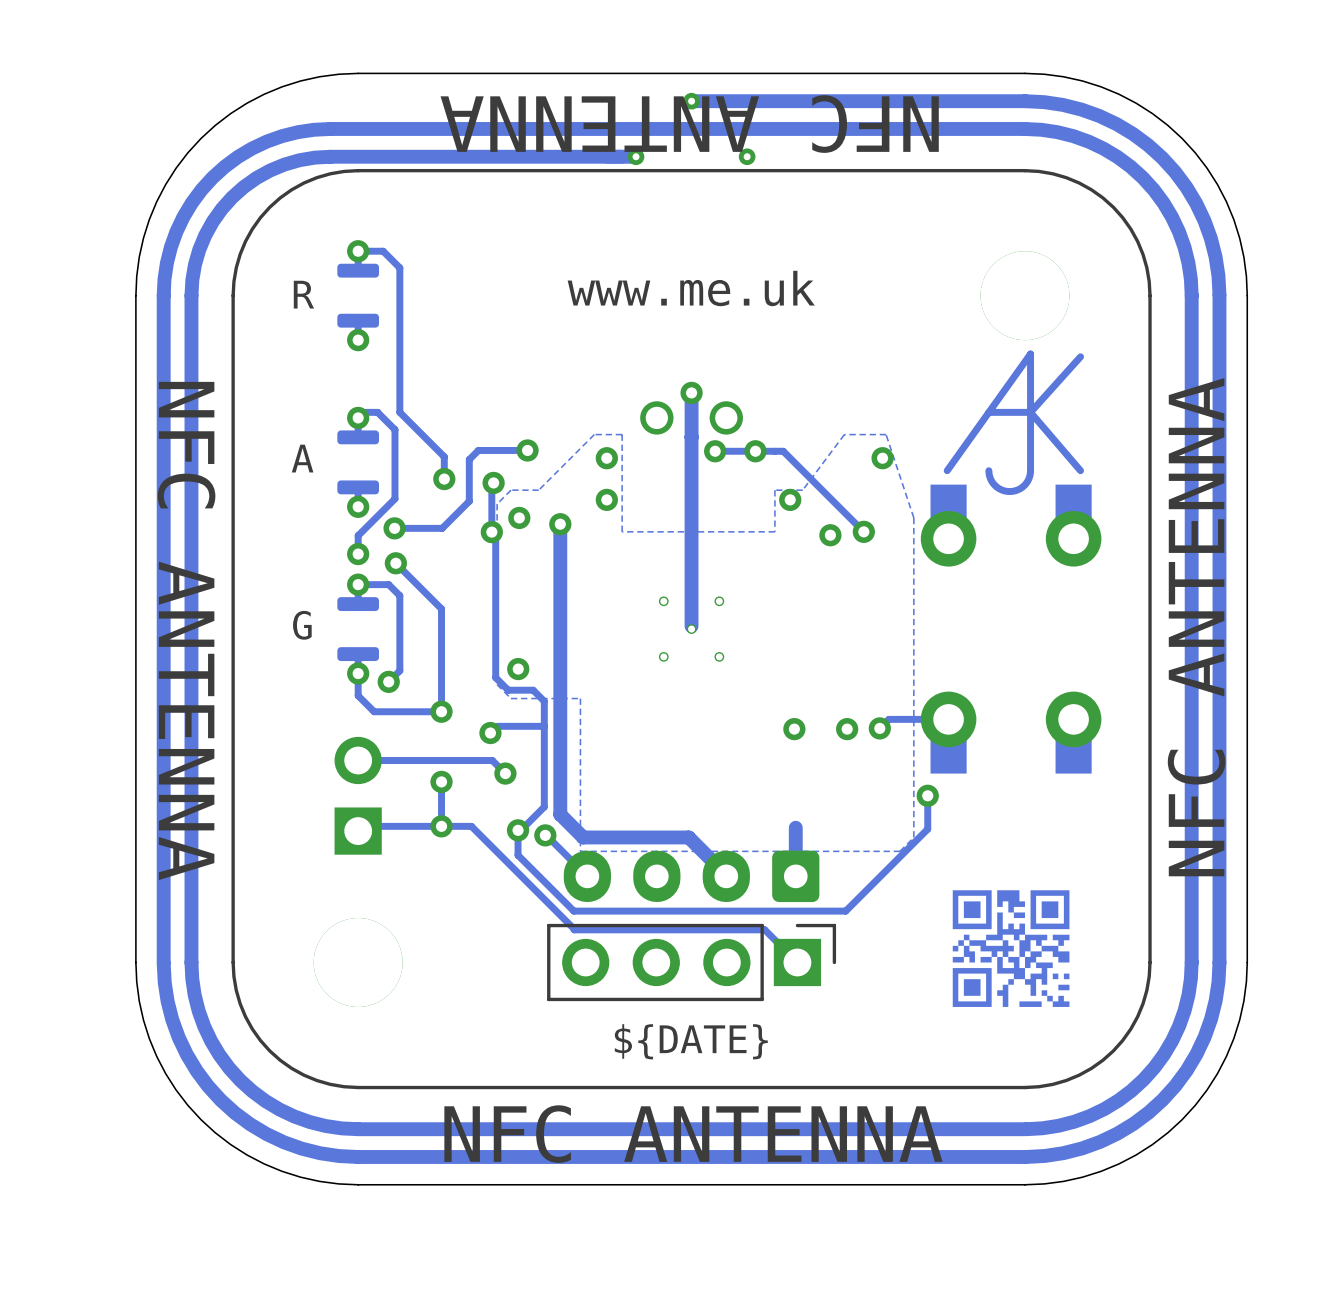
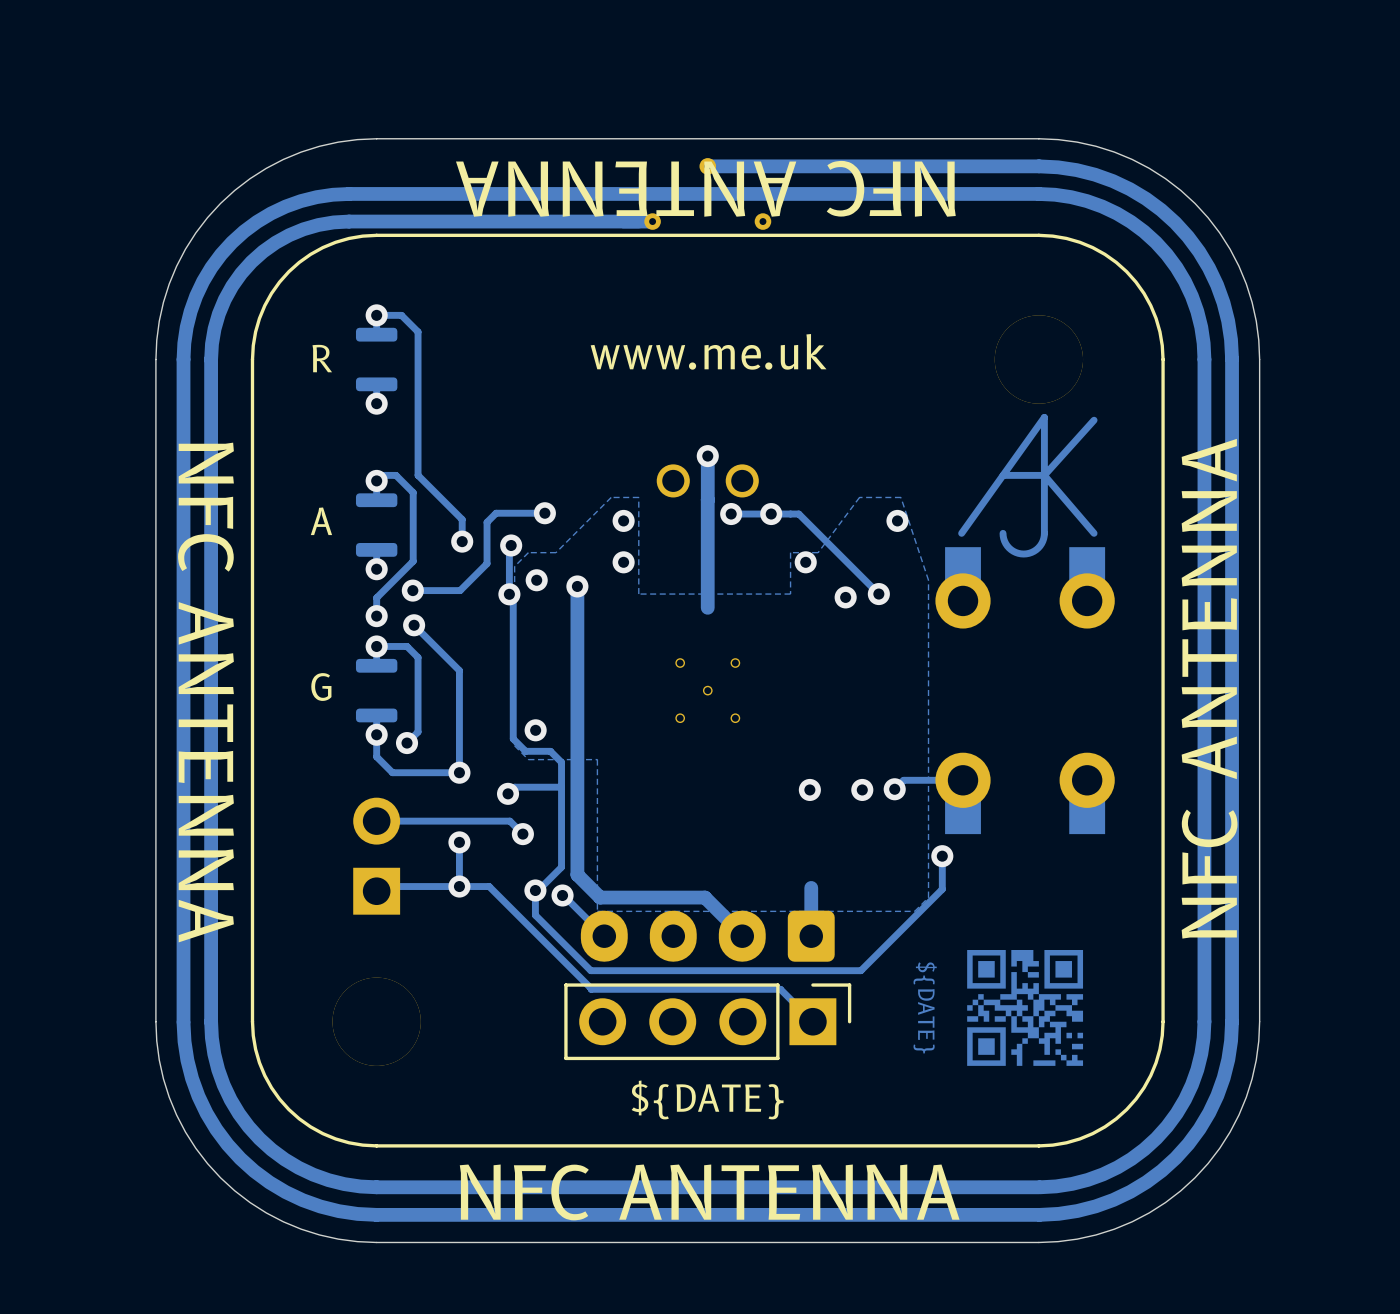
track: (691, 545) (691, 626) -> none
text: none -> ${DATE} (925, 1007)

